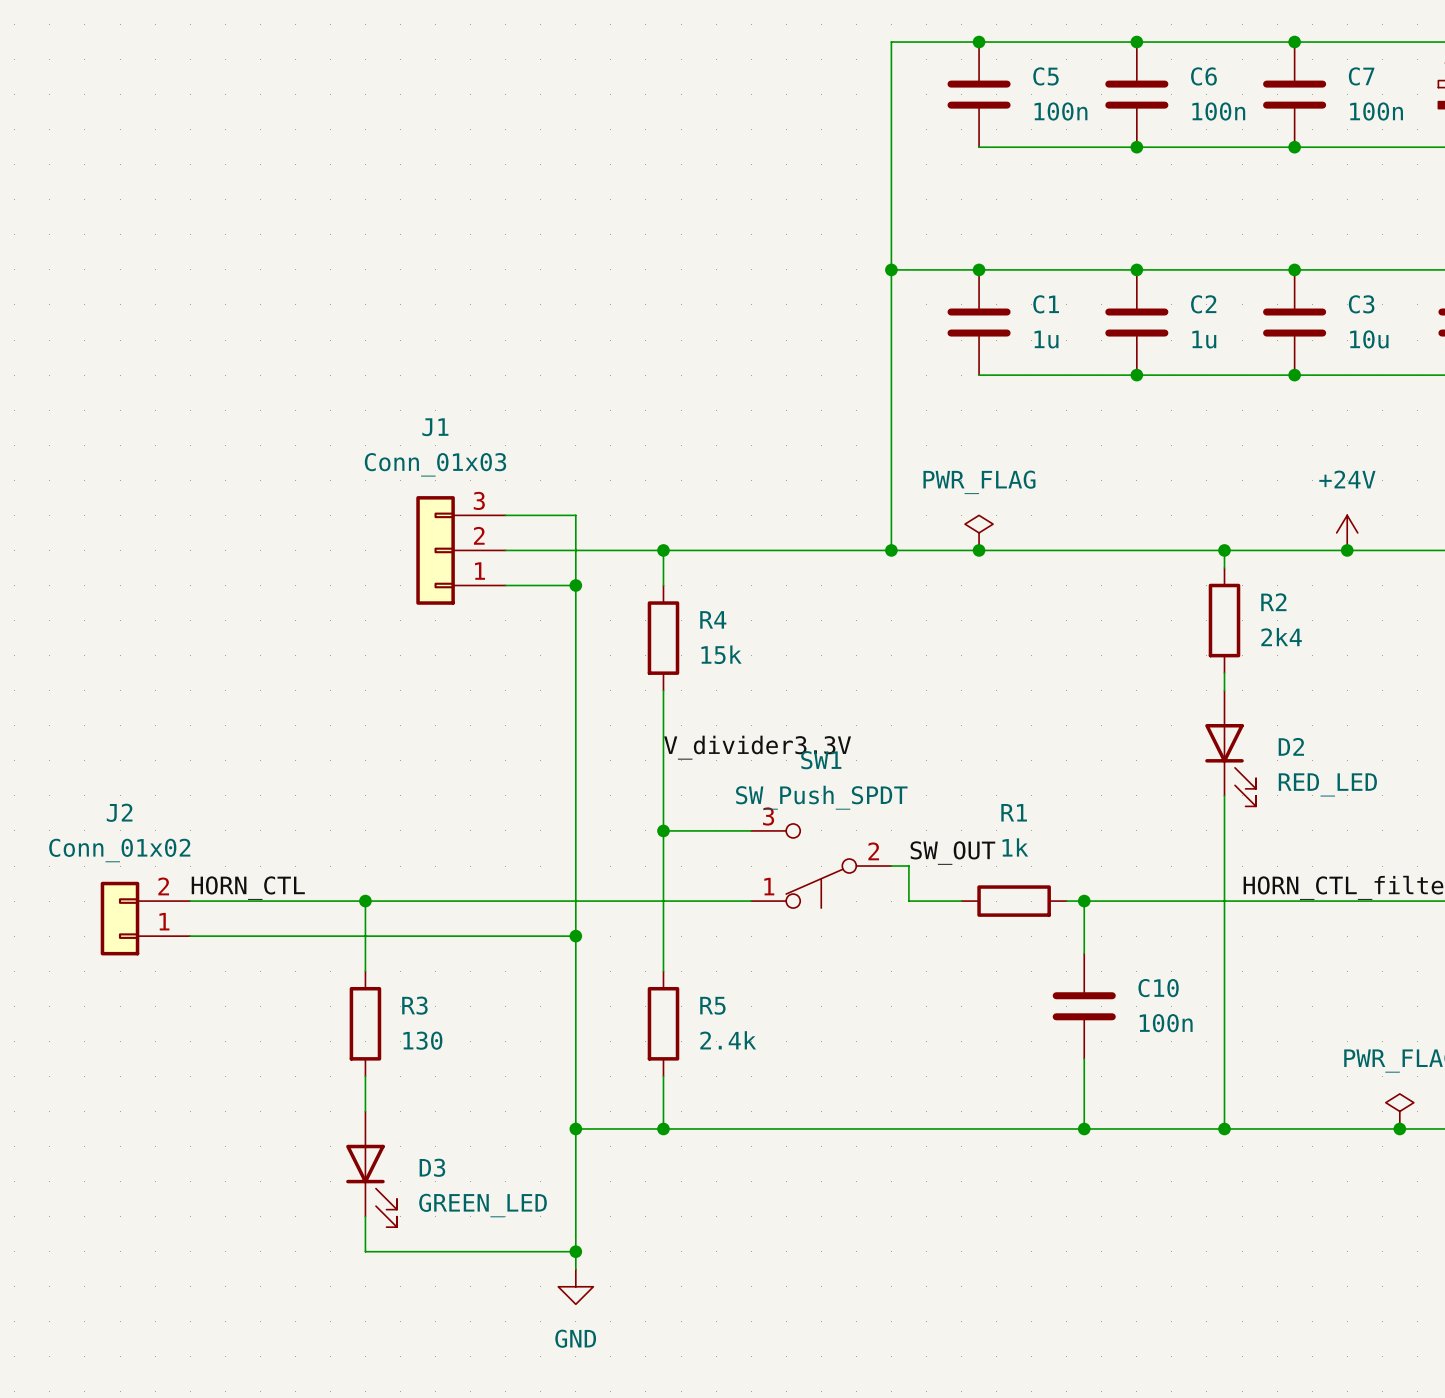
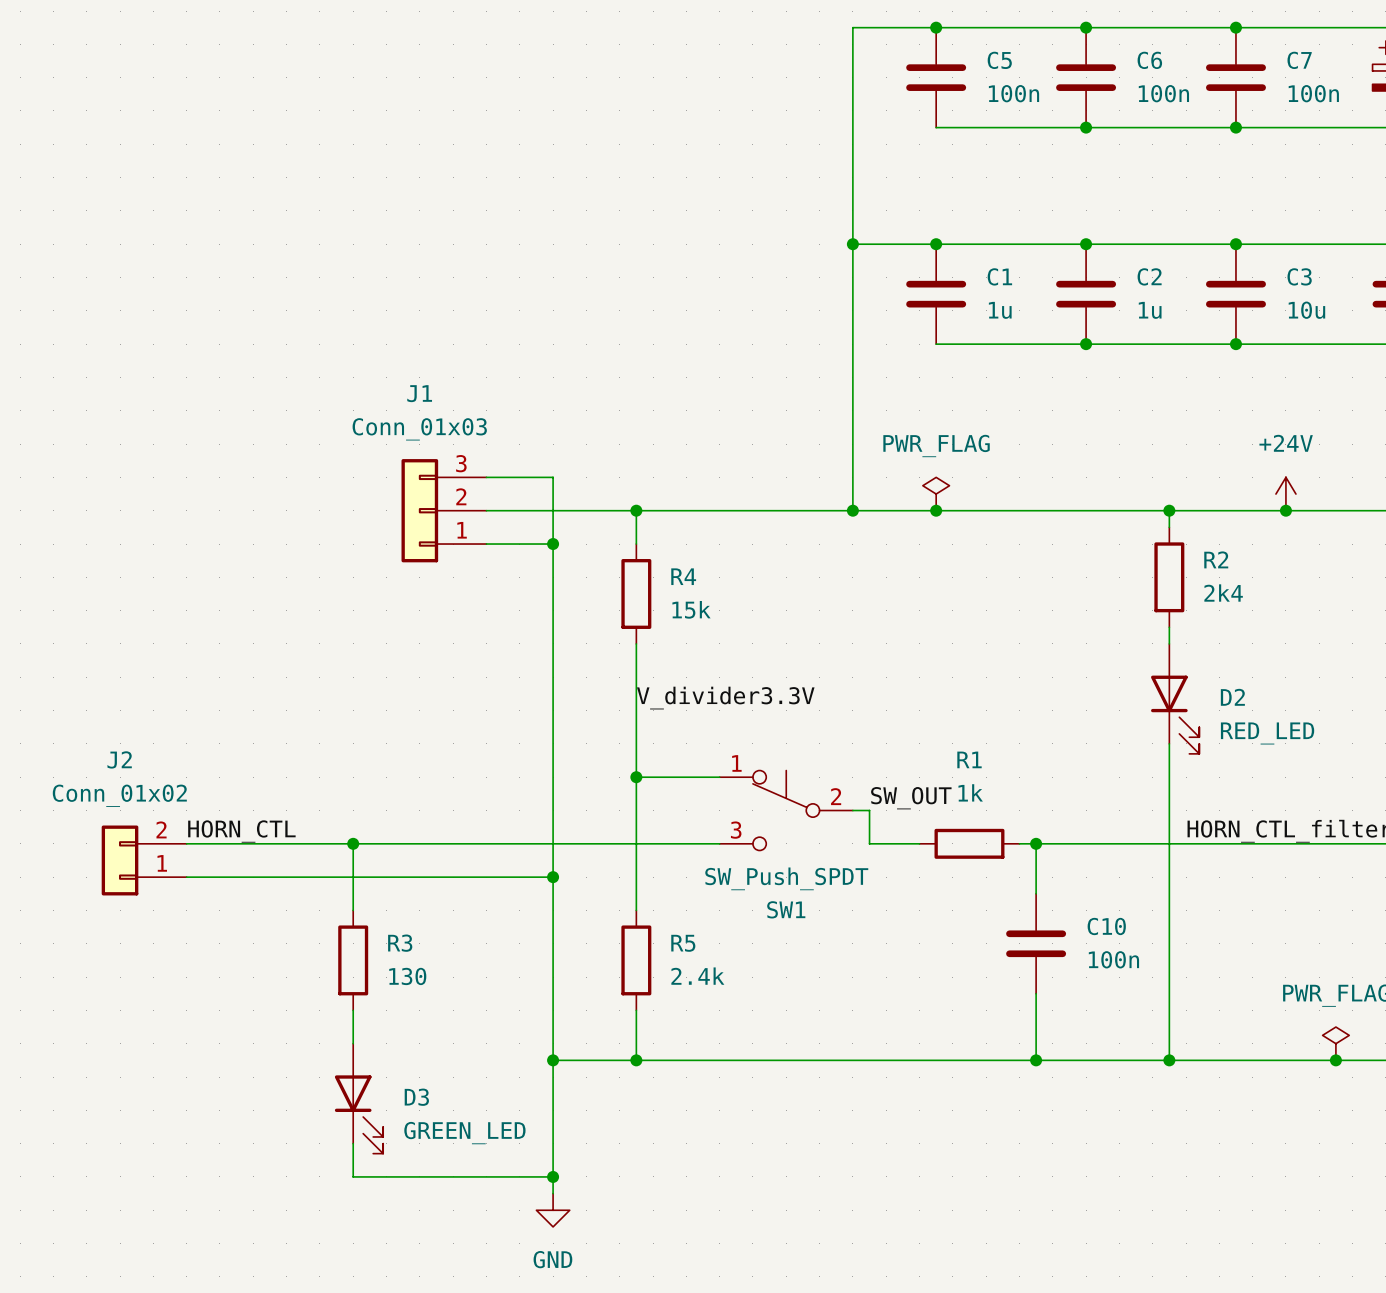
SW1 flip: as is (821, 866) -> up-down (786, 810)

